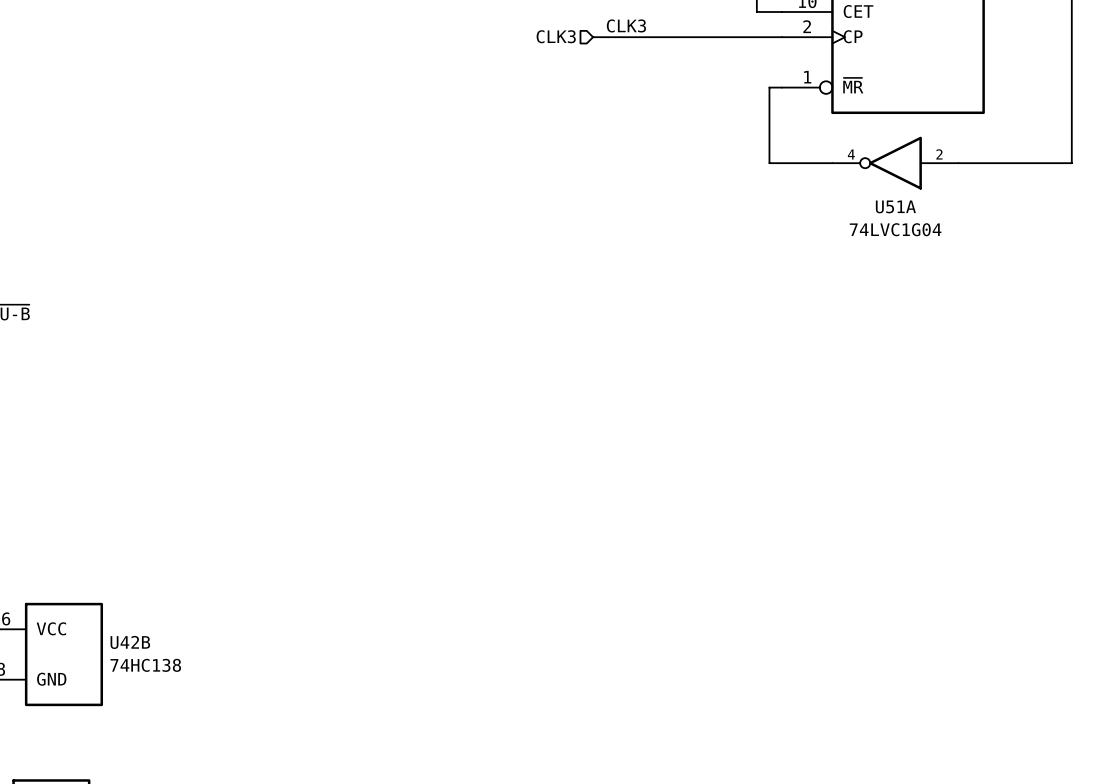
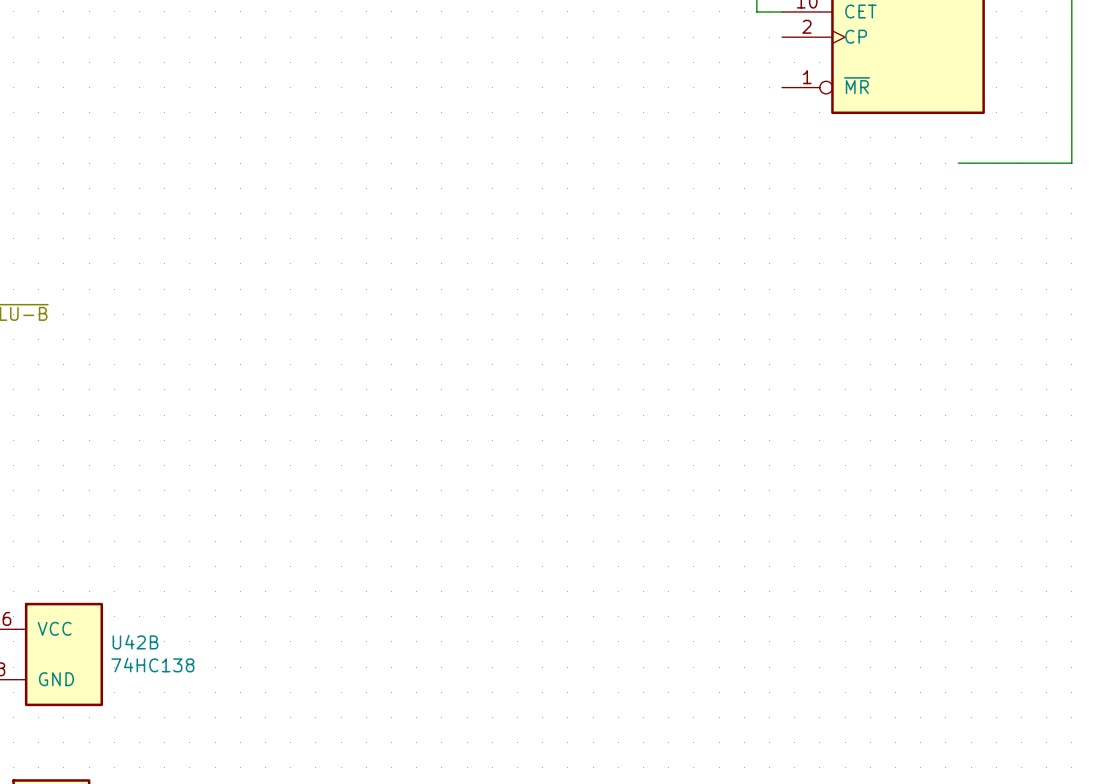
label: CLK3 (626, 25) -> none
hierarchical label: CLK3 (556, 36) -> none
wire: (593, 37) (782, 37) -> none
wire: (782, 87) (769, 87) (769, 163) (832, 163) -> none
U51A: 74LVC1G04 (895, 163) -> none

